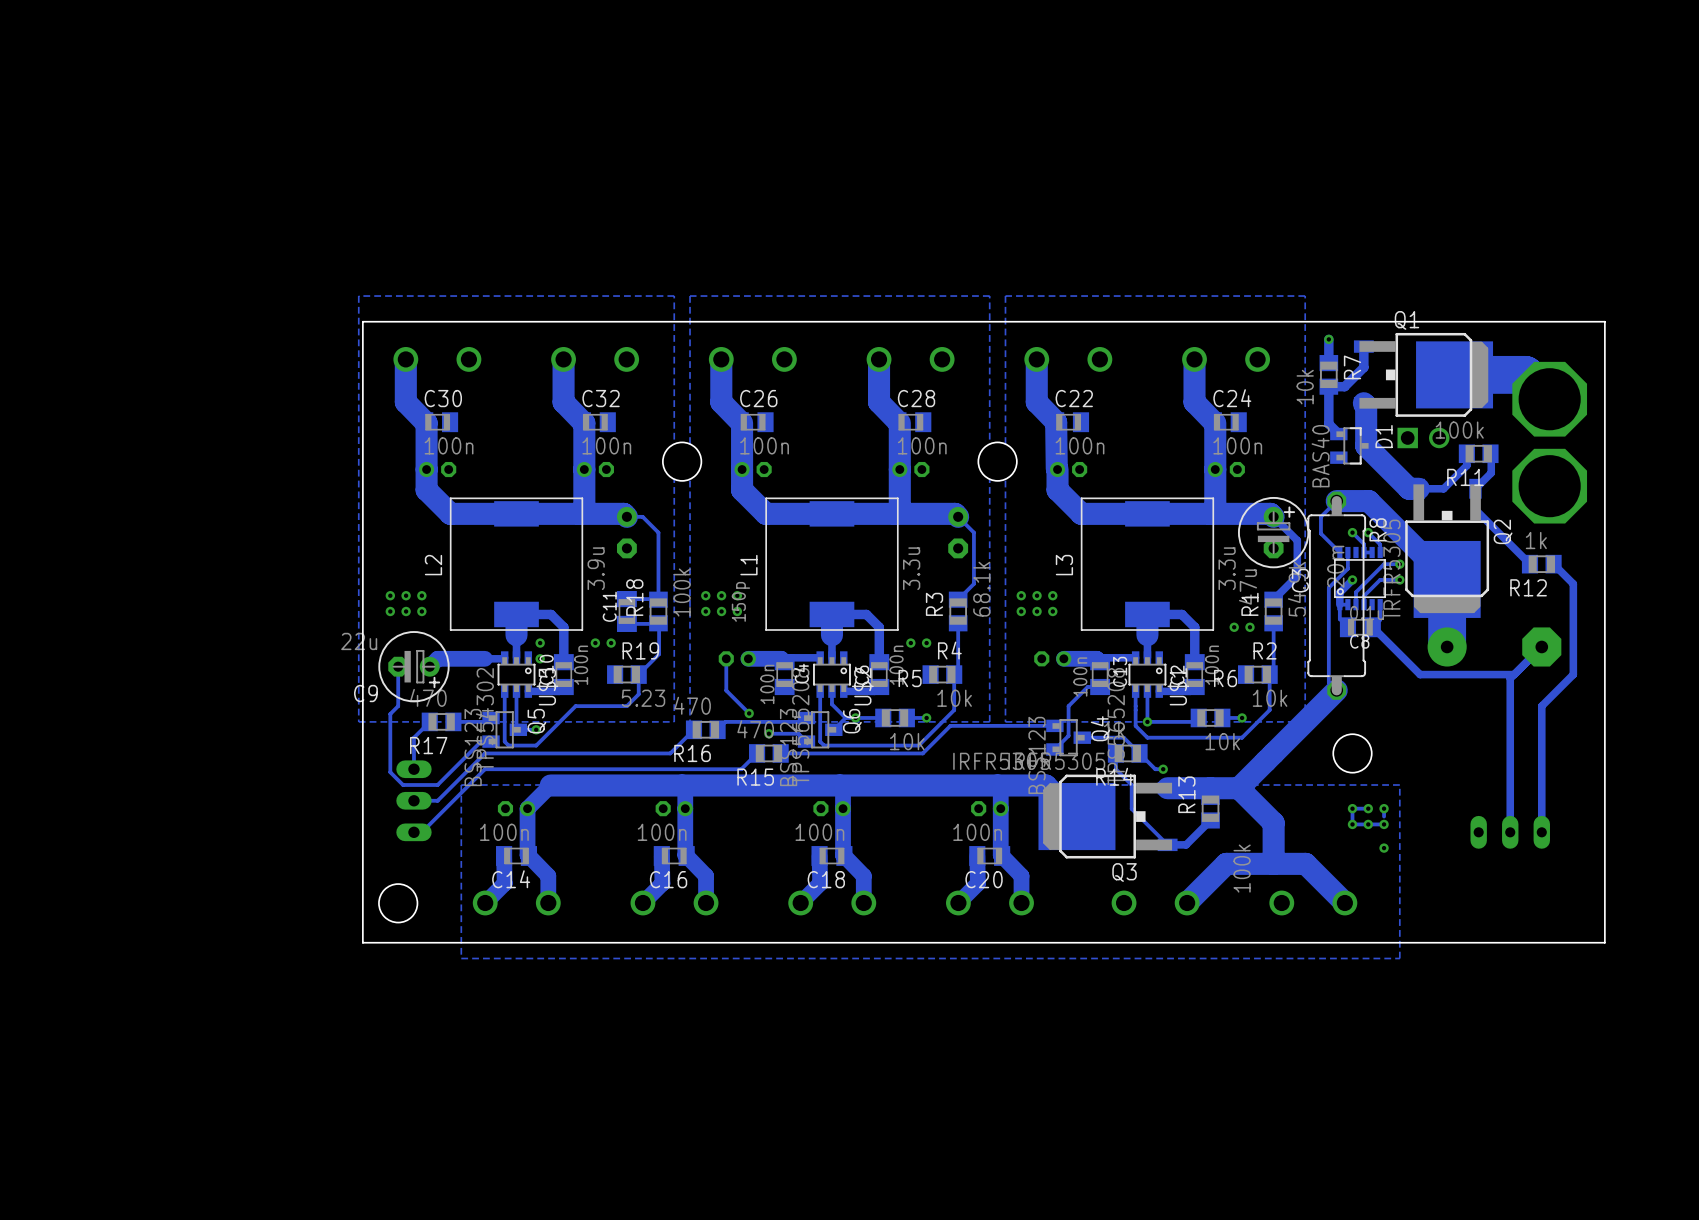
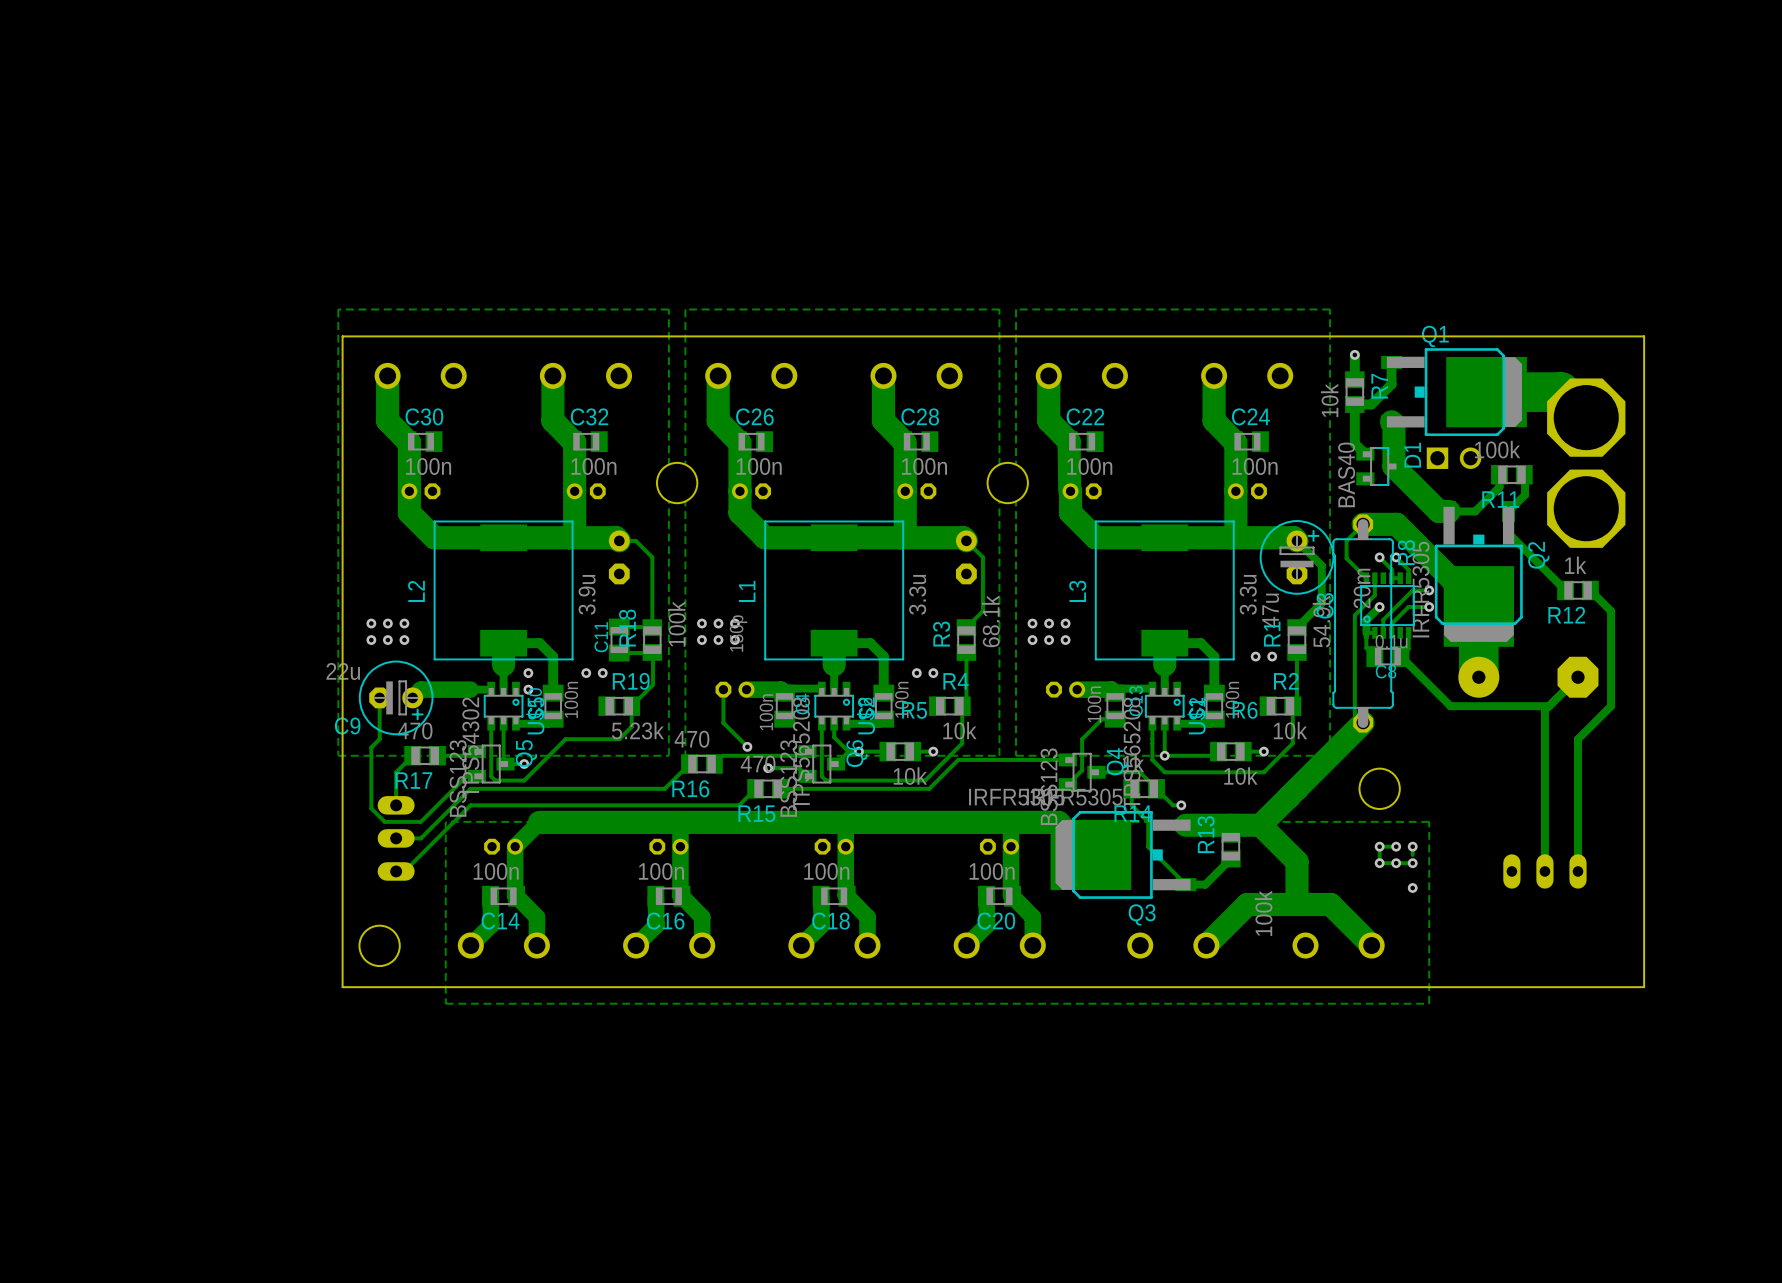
R19 value: 5.23 (643, 698) -> 5.23k (637, 730)

